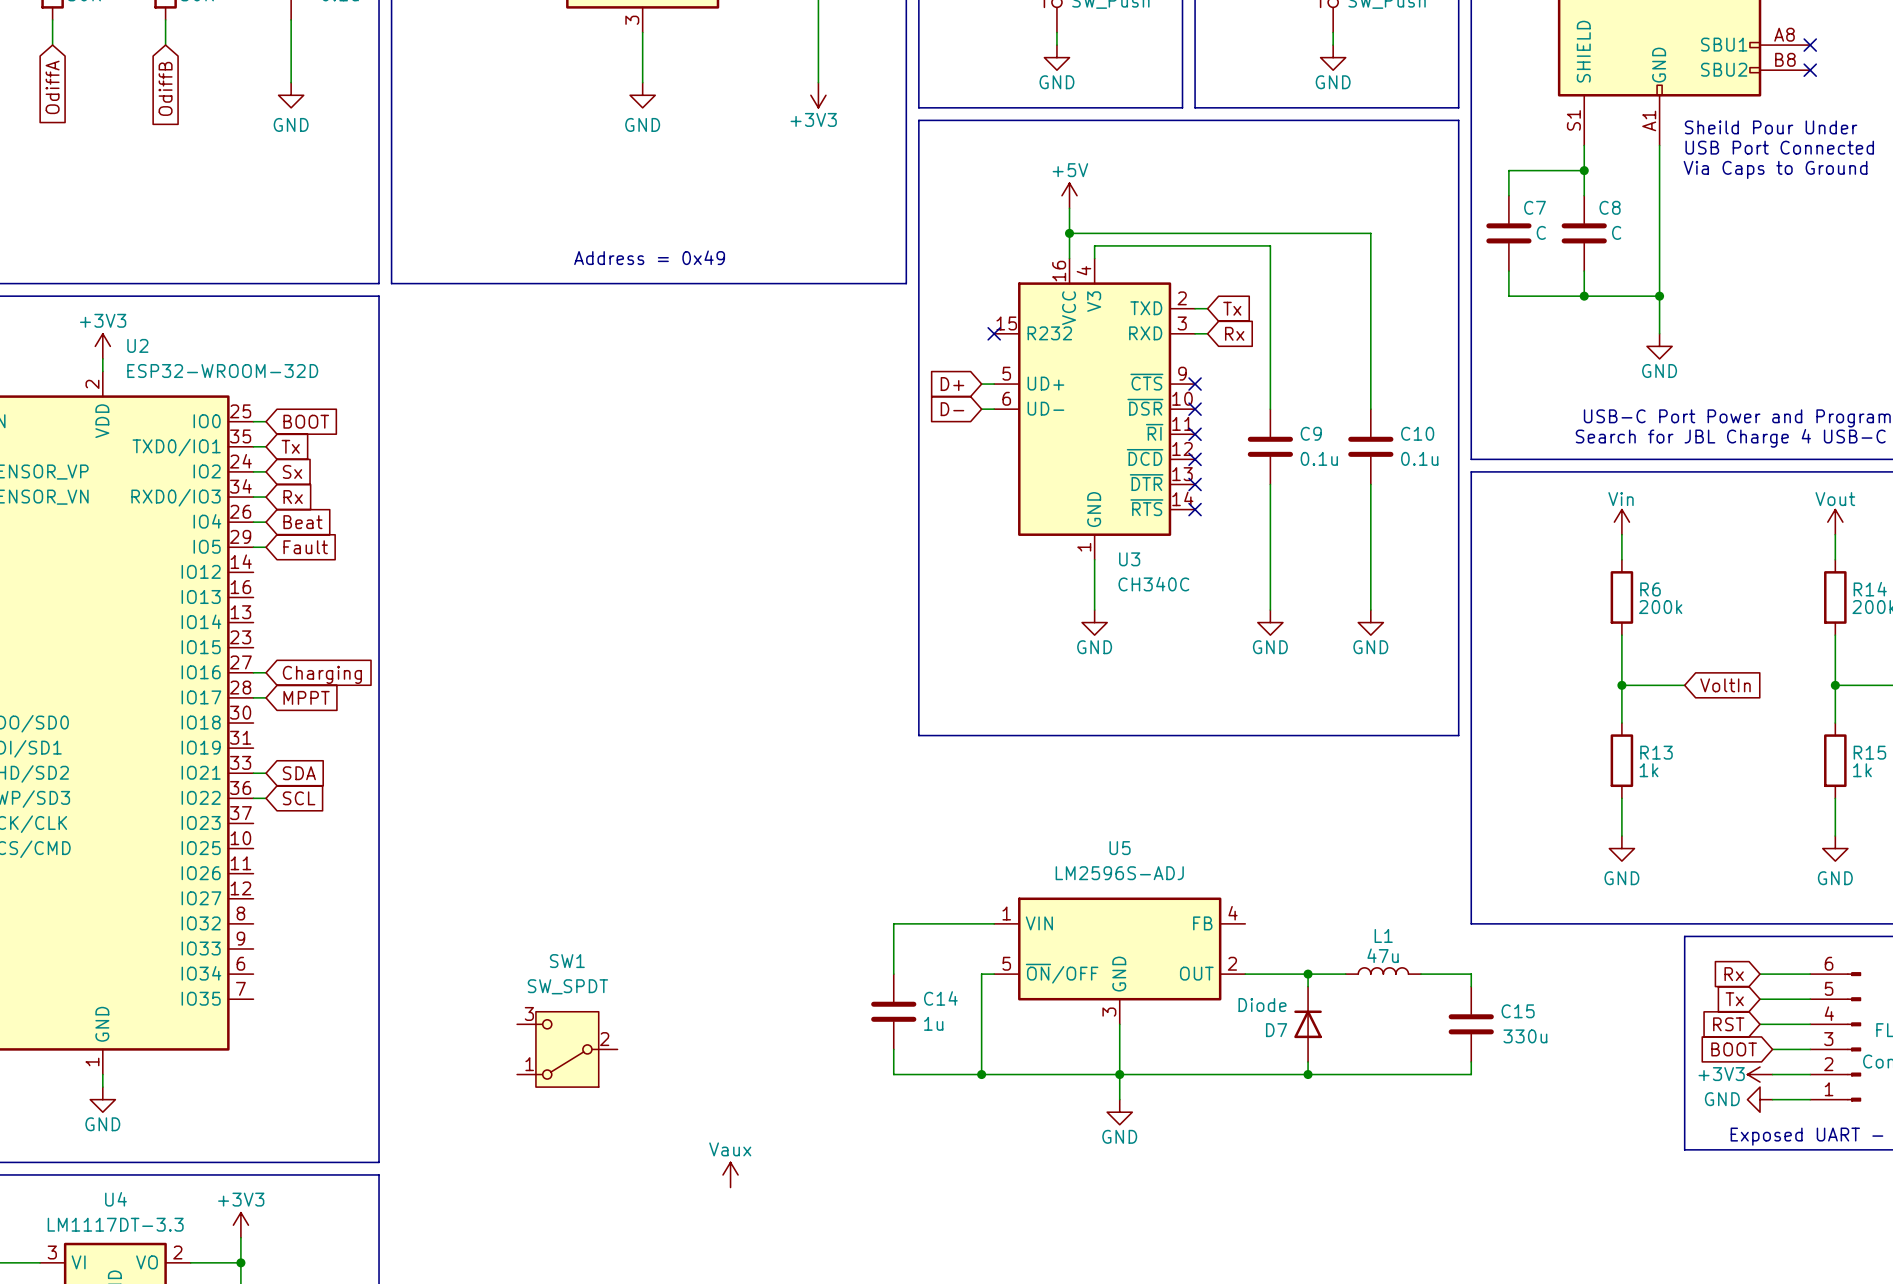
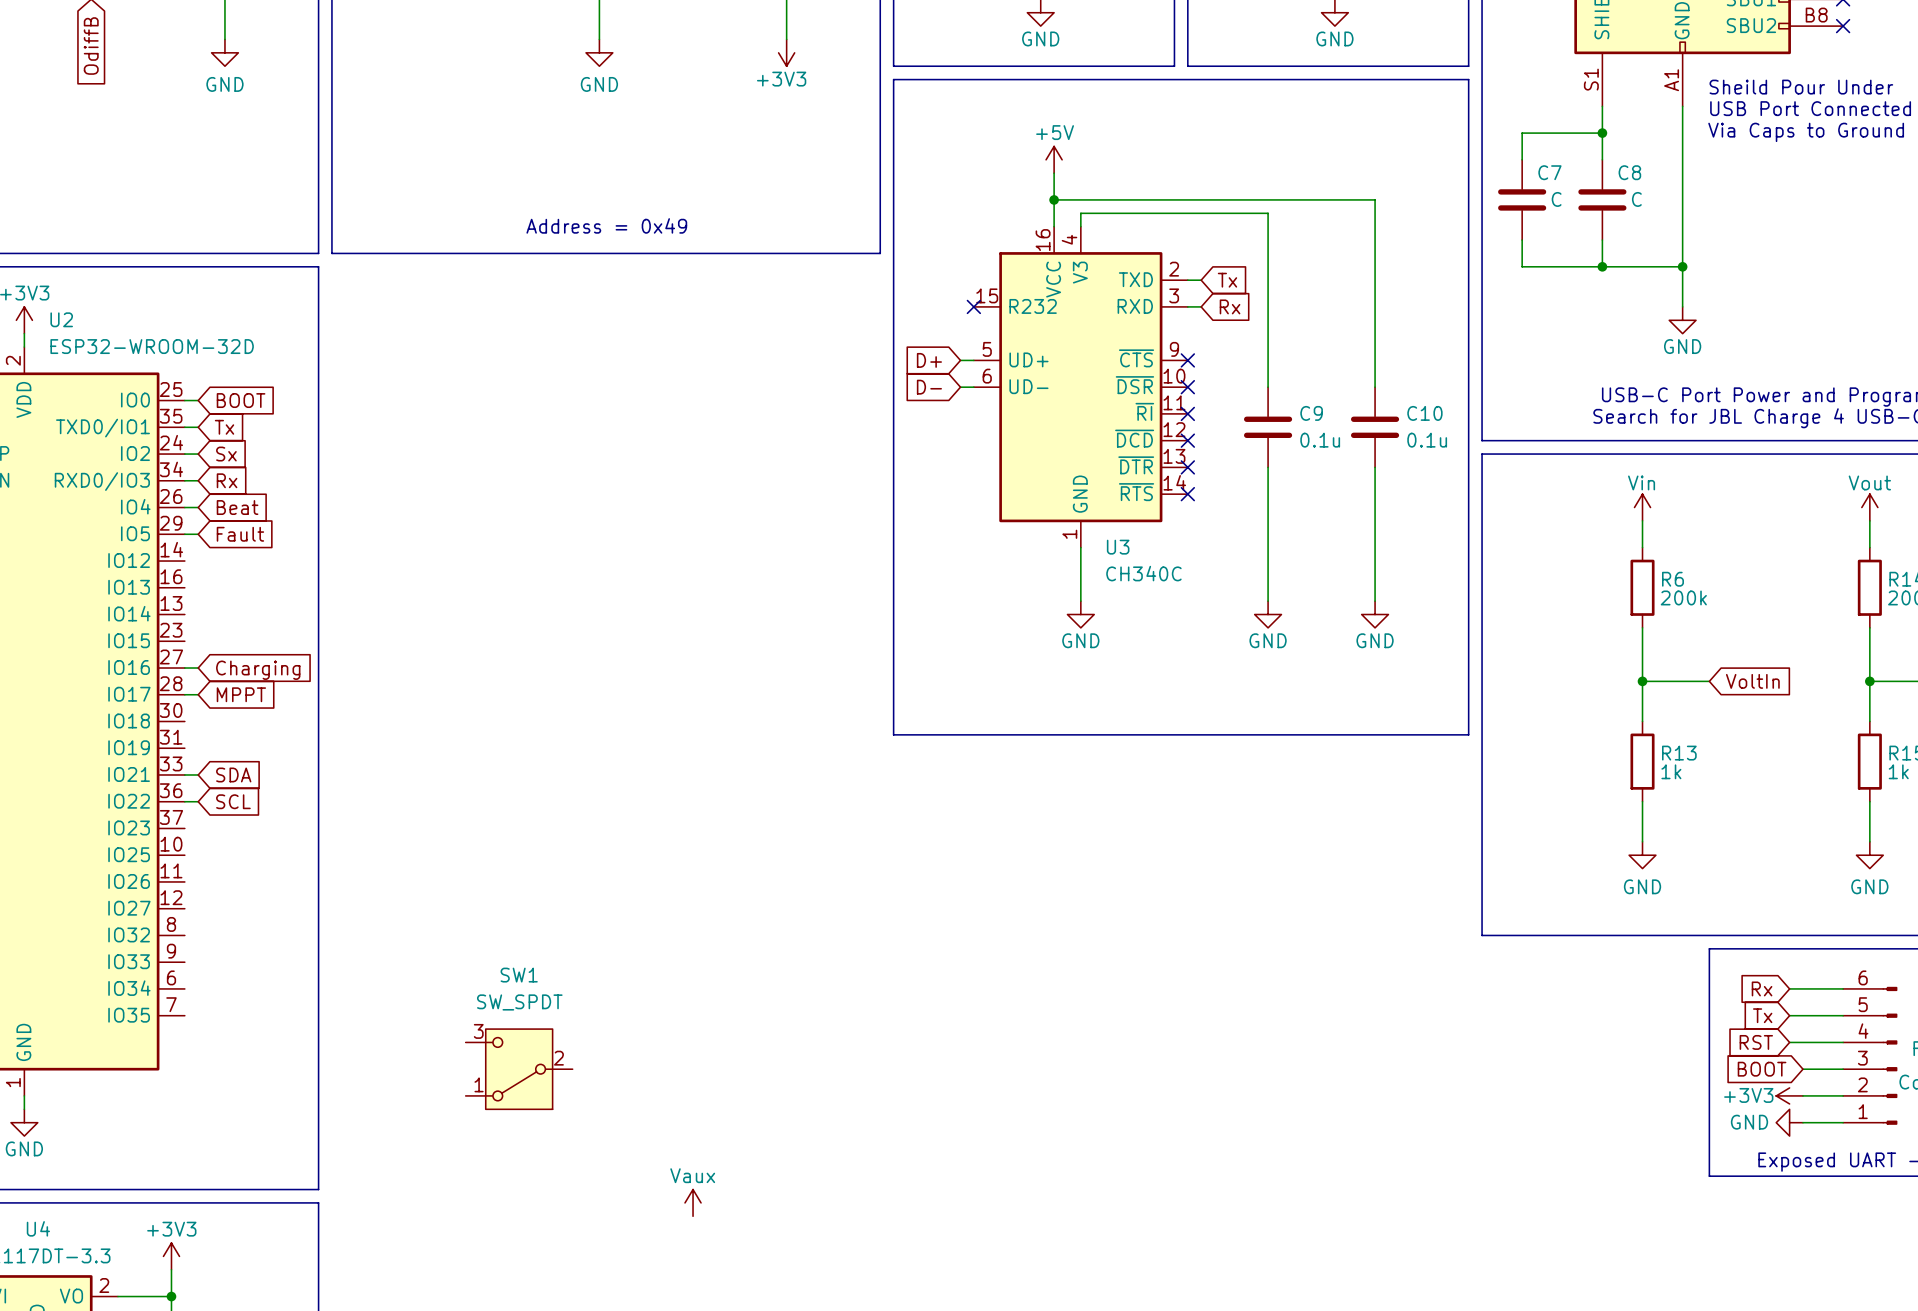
wire: (994, 923) (893, 923) (893, 974) -> none
U5: LM2596S-ADJ (1119, 960) -> none
L1: 47u (1383, 970) -> none
wire: (994, 974) (981, 974) (981, 1074) -> none
wire: (1245, 974) (1345, 974) -> none
wire: (1308, 974) (1308, 986) -> none
junction: (1308, 974) -> none
wire: (1421, 974) (1471, 974) (1471, 986) -> none
C14: 1u (893, 1011) -> none
wire: (1119, 1024) (1119, 1099) -> none
D7: Diode (1308, 1024) -> none
C15: 330u (1471, 1024) -> none
wire: (893, 1049) (893, 1074) (1471, 1074) (1471, 1061) -> none
wire: (1308, 1061) (1308, 1074) -> none
junction: (981, 1074) -> none
junction: (1119, 1074) -> none
junction: (1308, 1074) -> none
power symbol: GND (1119, 1112) -> none

